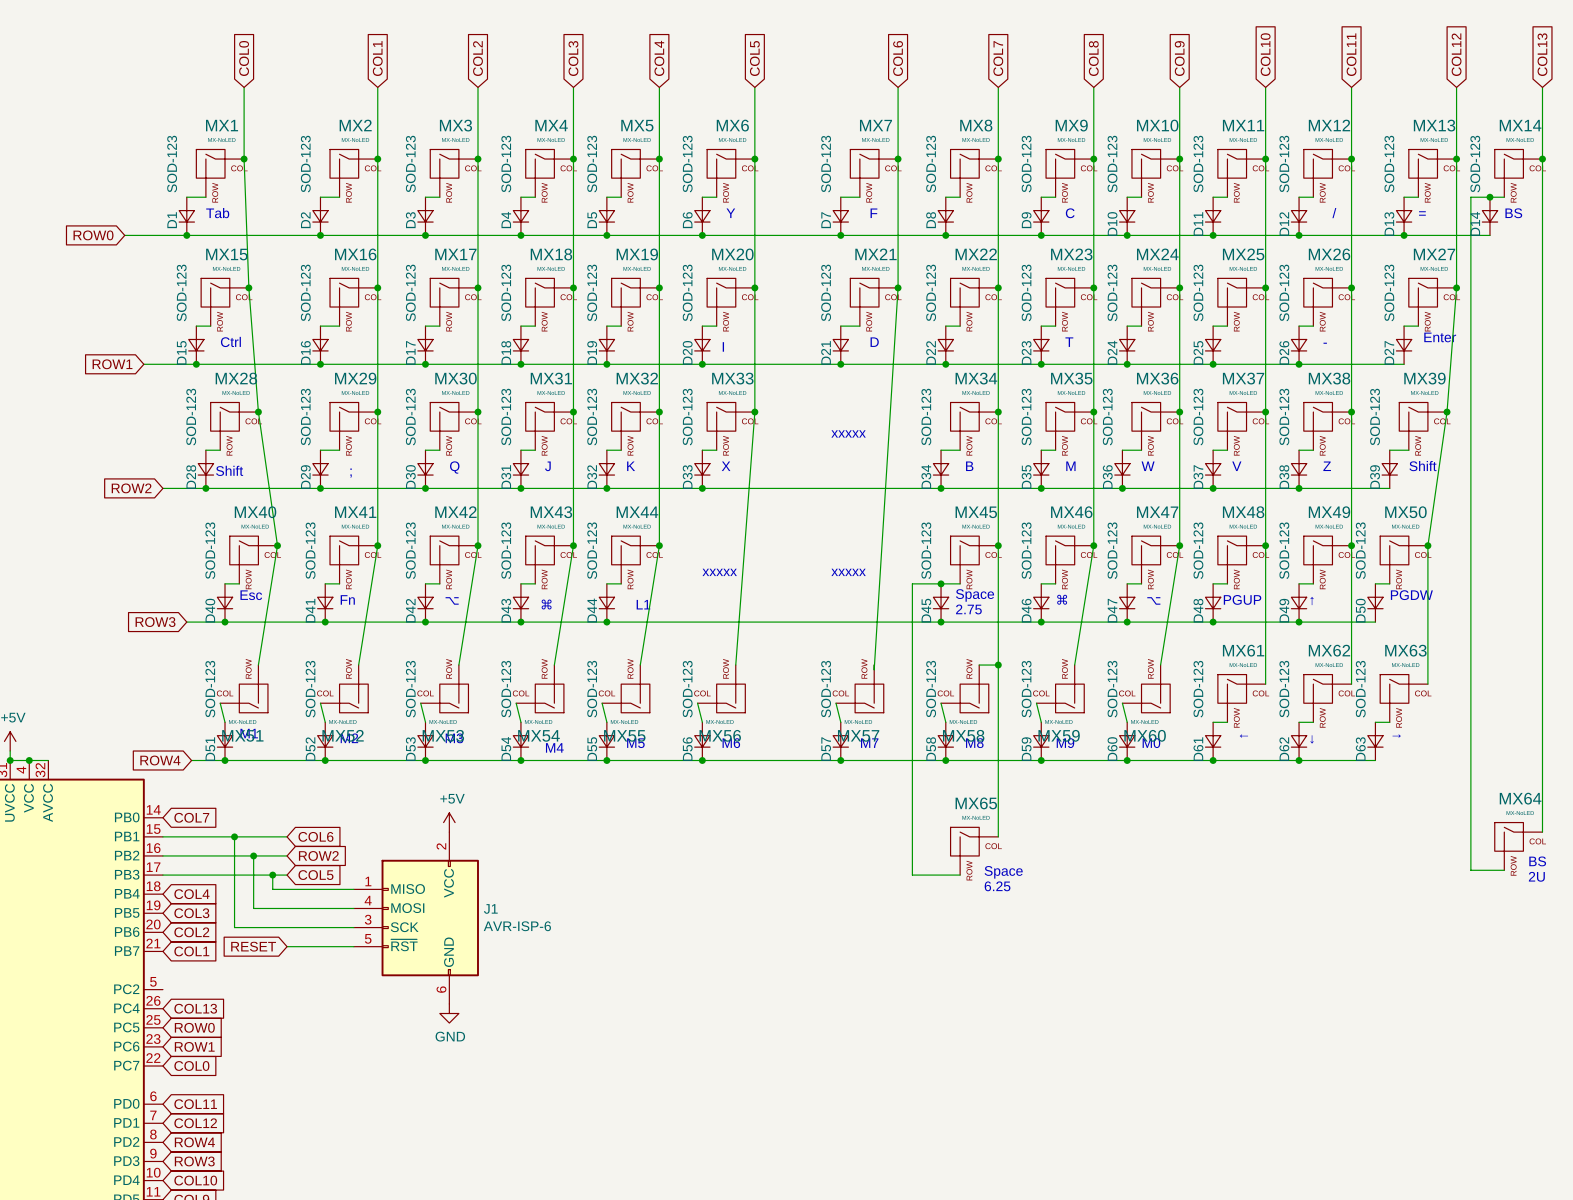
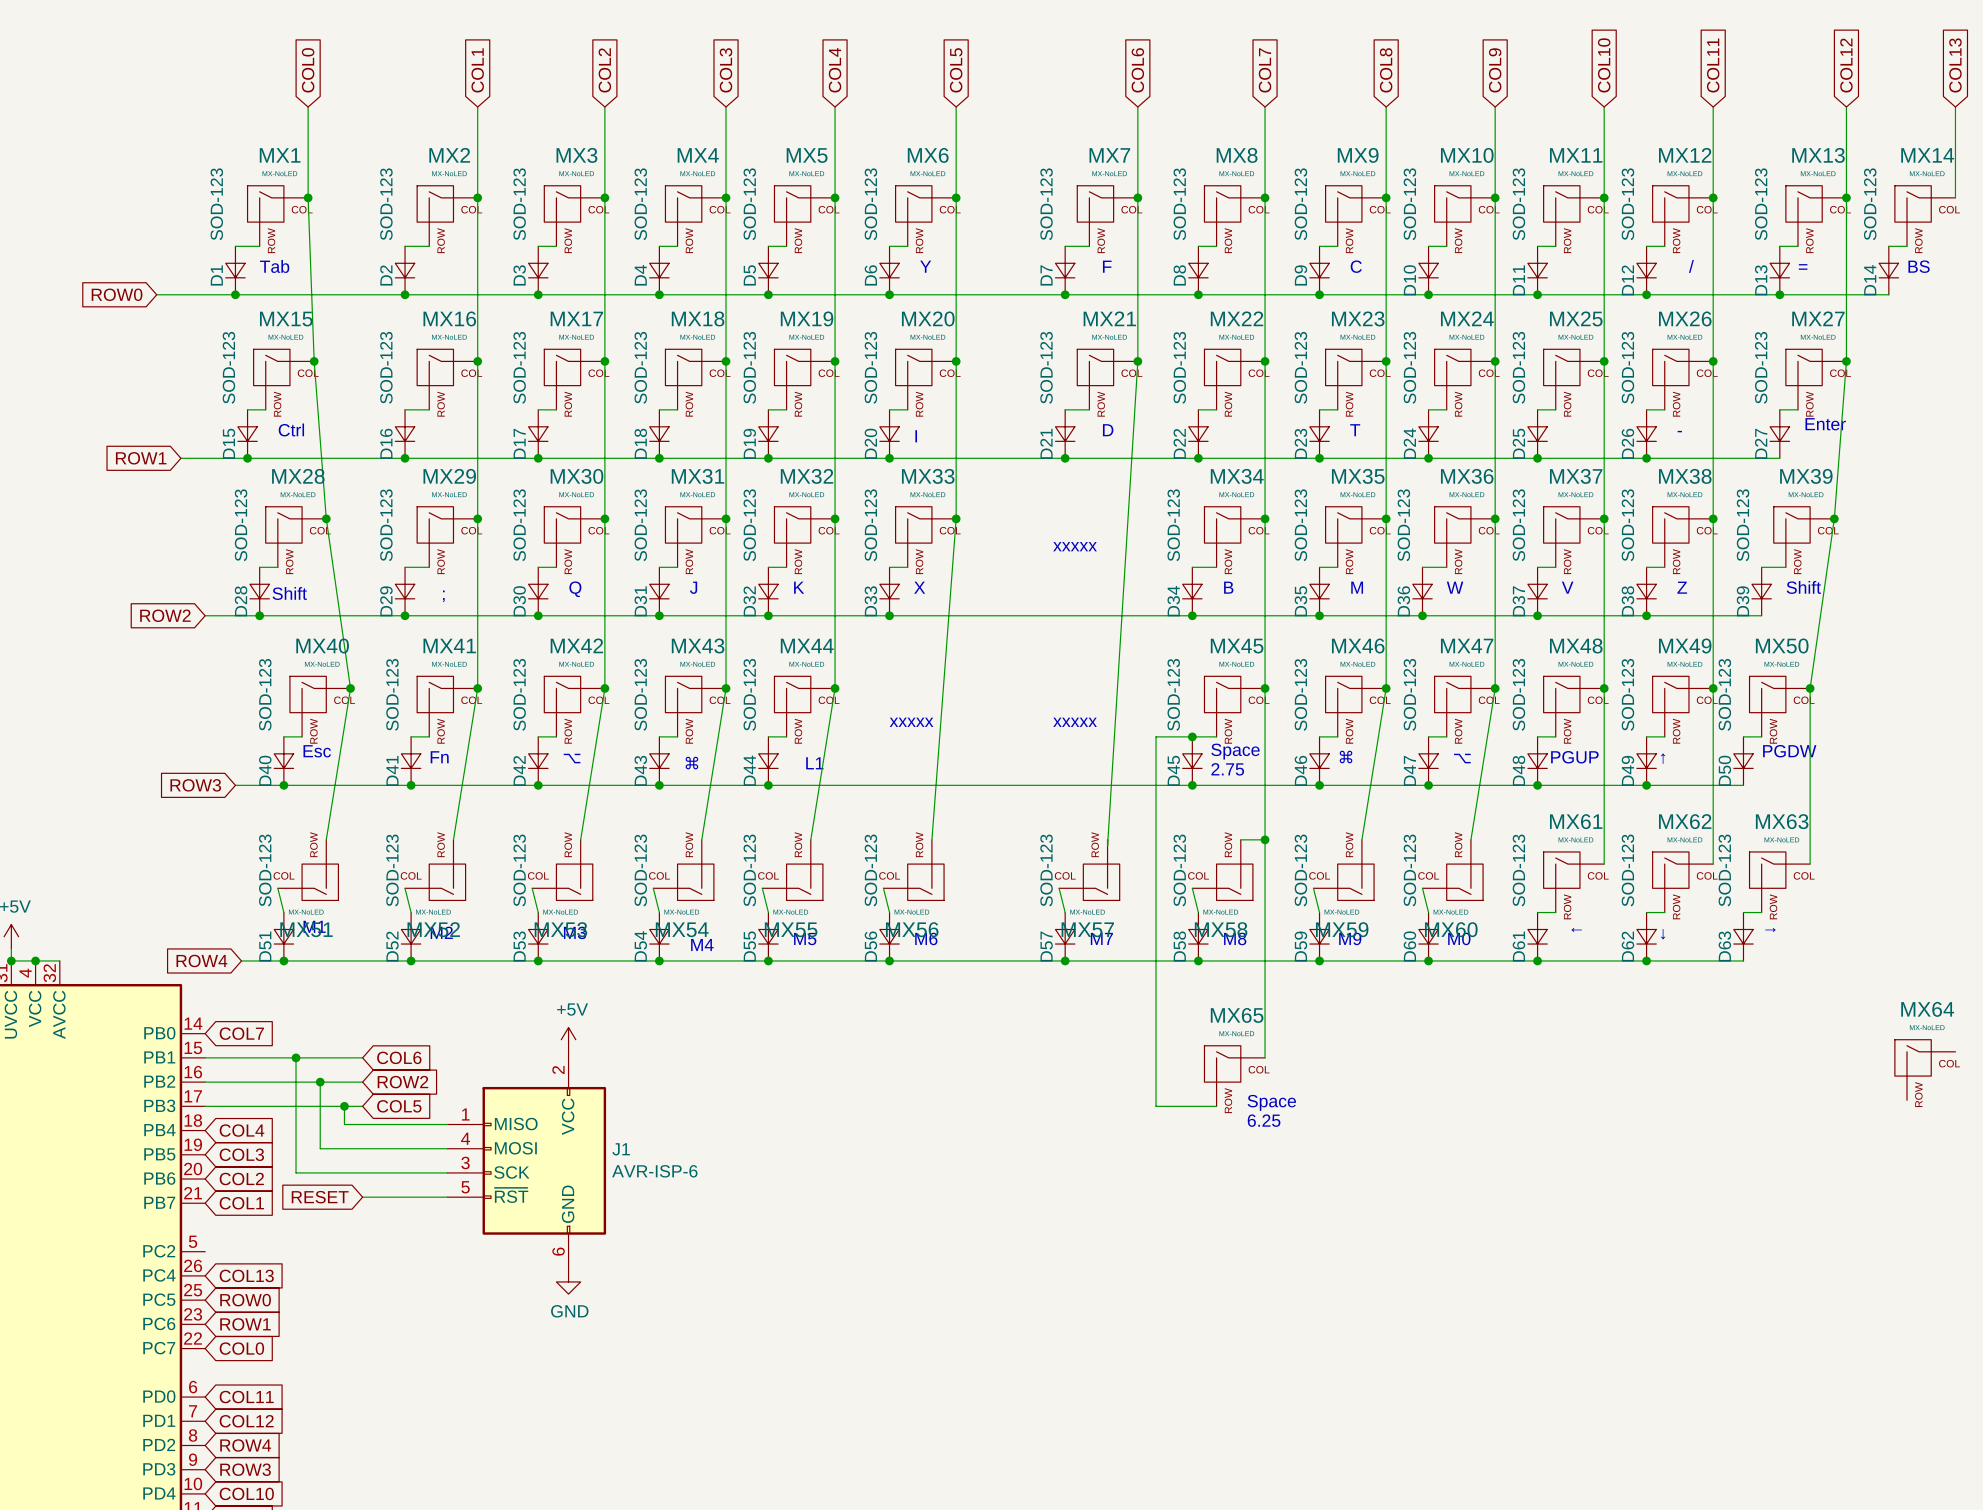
wire: (1542, 159) (1542, 832) -> none
junction: (1542, 159) -> none
wire: (1489, 197) (1470, 197) (1470, 870) (1504, 870) -> none
junction: (1489, 197) -> none
text: BS (1537, 861) -> none
text: 2U (1536, 876) -> none

